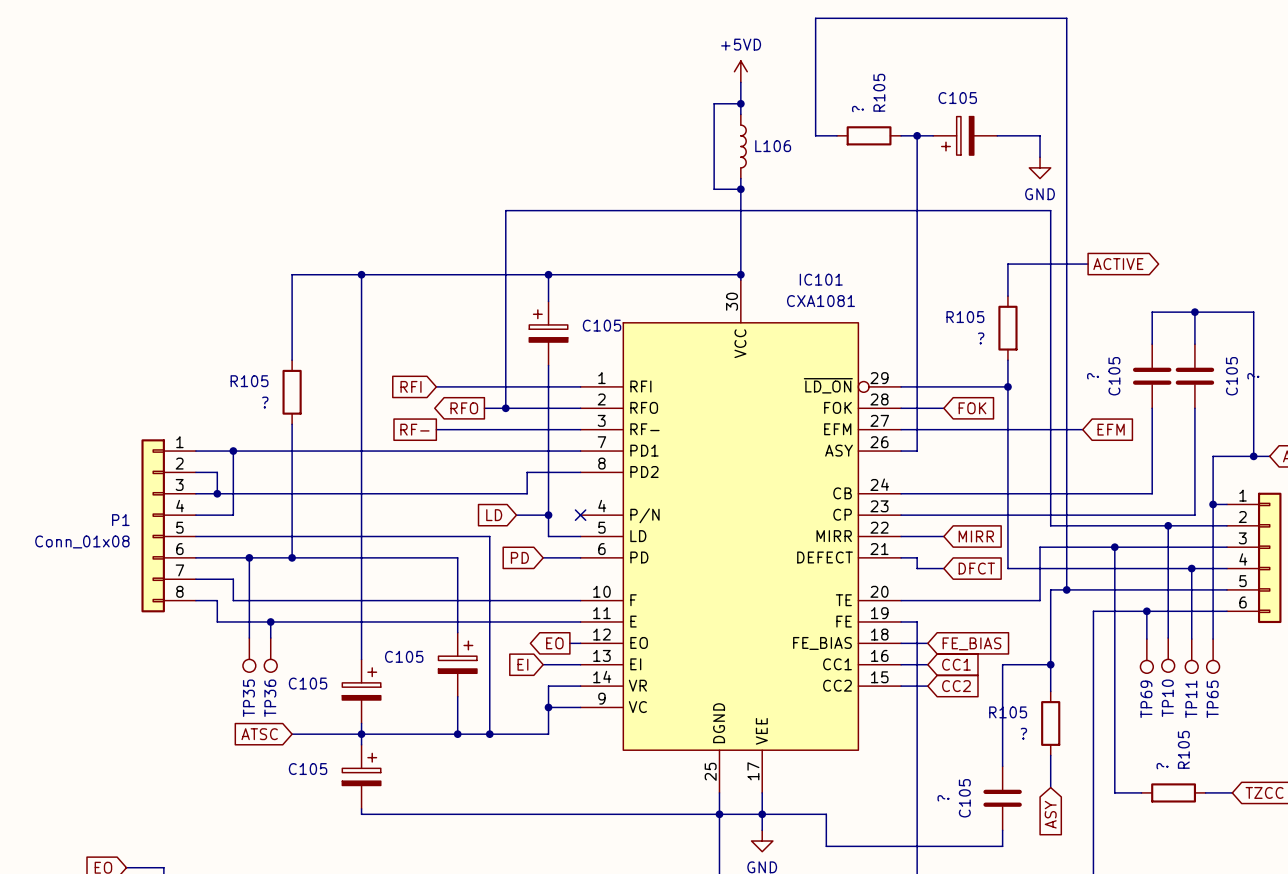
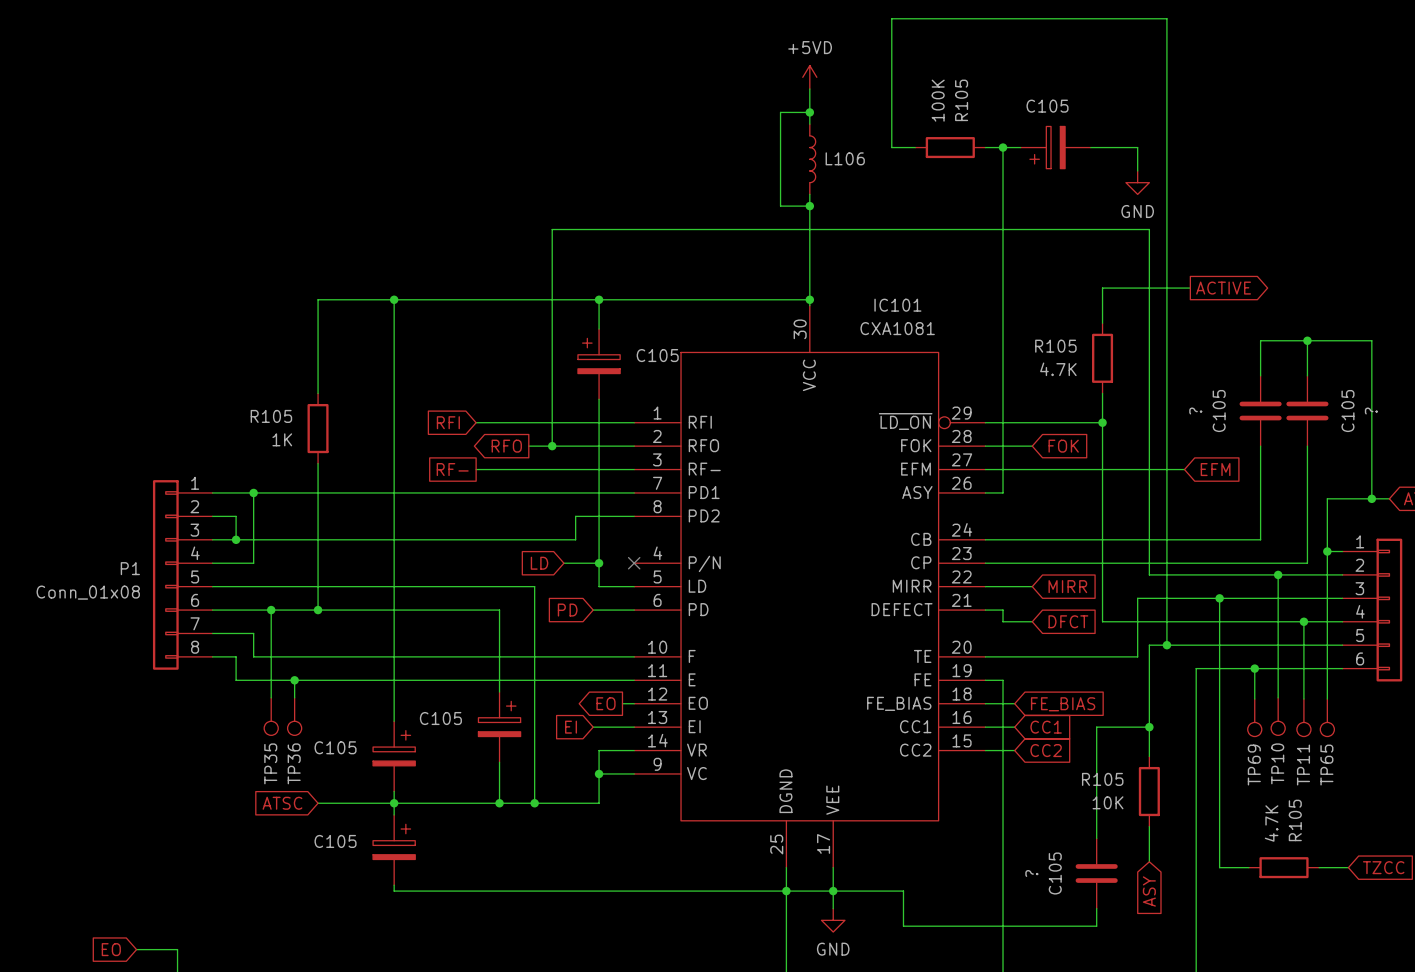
R105 value: ? (857, 109) -> 100K (938, 100)
R105 value: ? (981, 338) -> 4.7K (1058, 369)
R105 value: ? (265, 402) -> 1K (282, 439)
R105 value: ? (1023, 733) -> 10K (1108, 802)
R105 value: ? (1162, 766) -> 4.7K (1271, 823)

